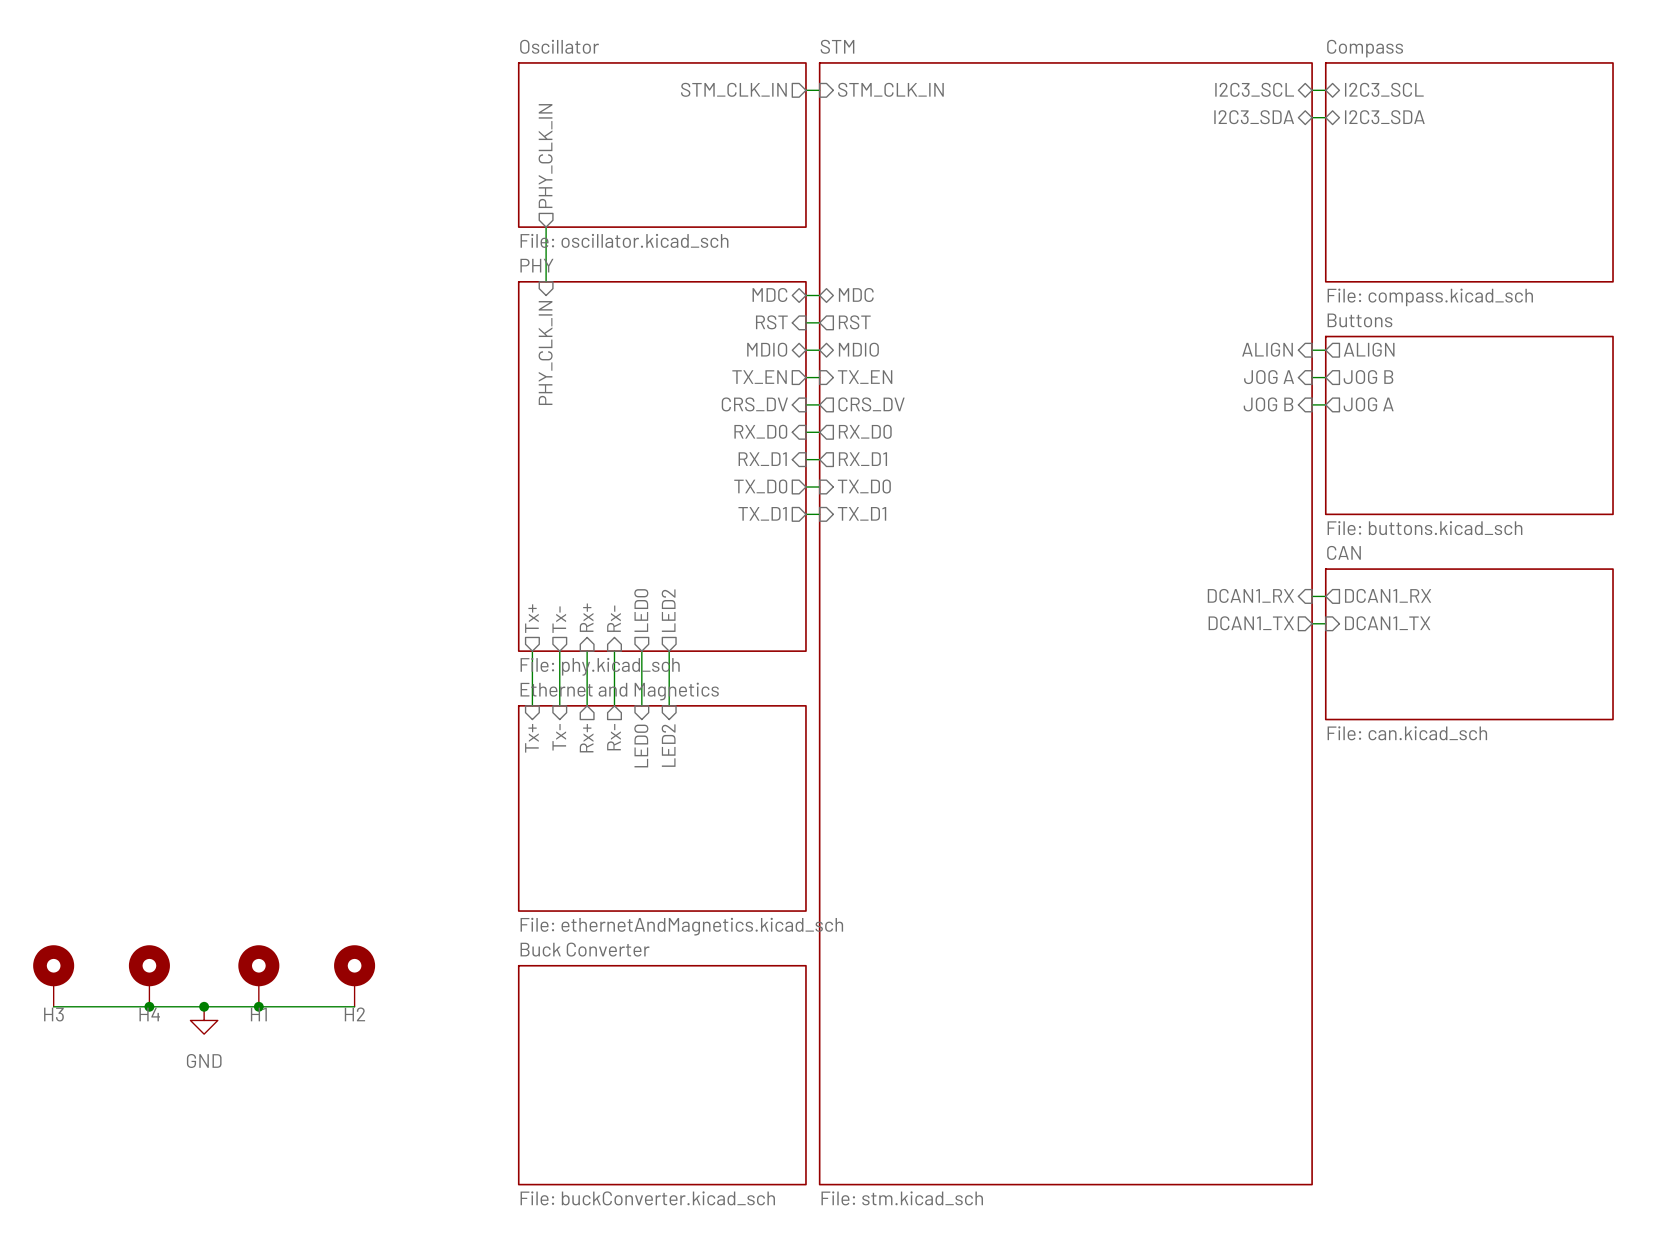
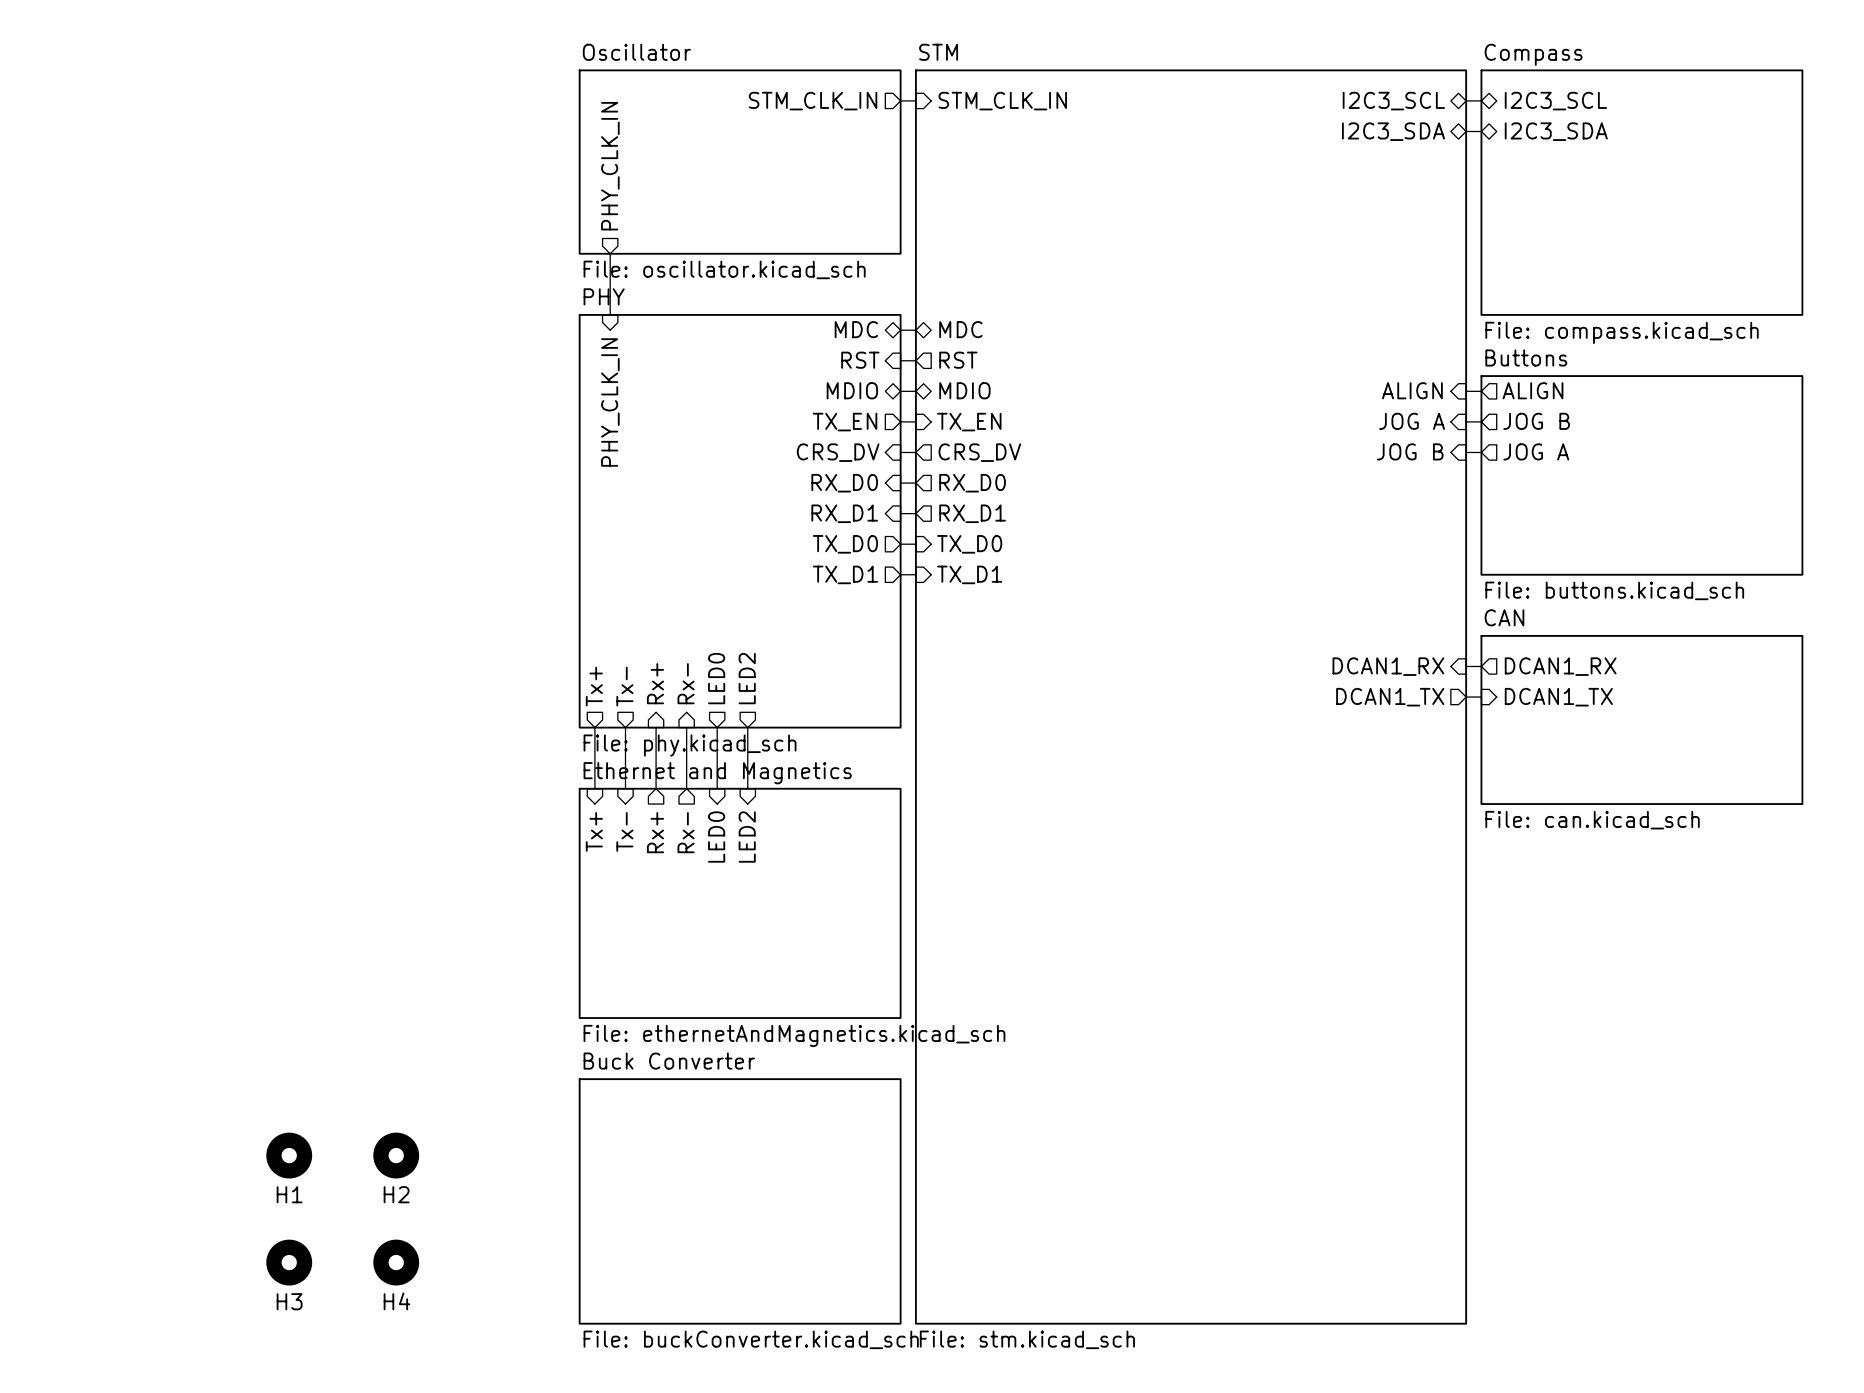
H3 symbol: [33, 945, 75, 1007] -> [266, 1239, 313, 1286]
H4 symbol: [128, 945, 170, 1007] -> [373, 1239, 420, 1286]
H1 symbol: [238, 945, 280, 1007] -> [266, 1132, 313, 1179]
H2 symbol: [334, 945, 376, 1007] -> [373, 1132, 420, 1179]
wire: (53, 1006) (354, 1006) -> none
junction: (149, 1006) -> none
junction: (204, 1006) -> none
junction: (258, 1006) -> none
power symbol: GND (204, 1020) -> none

